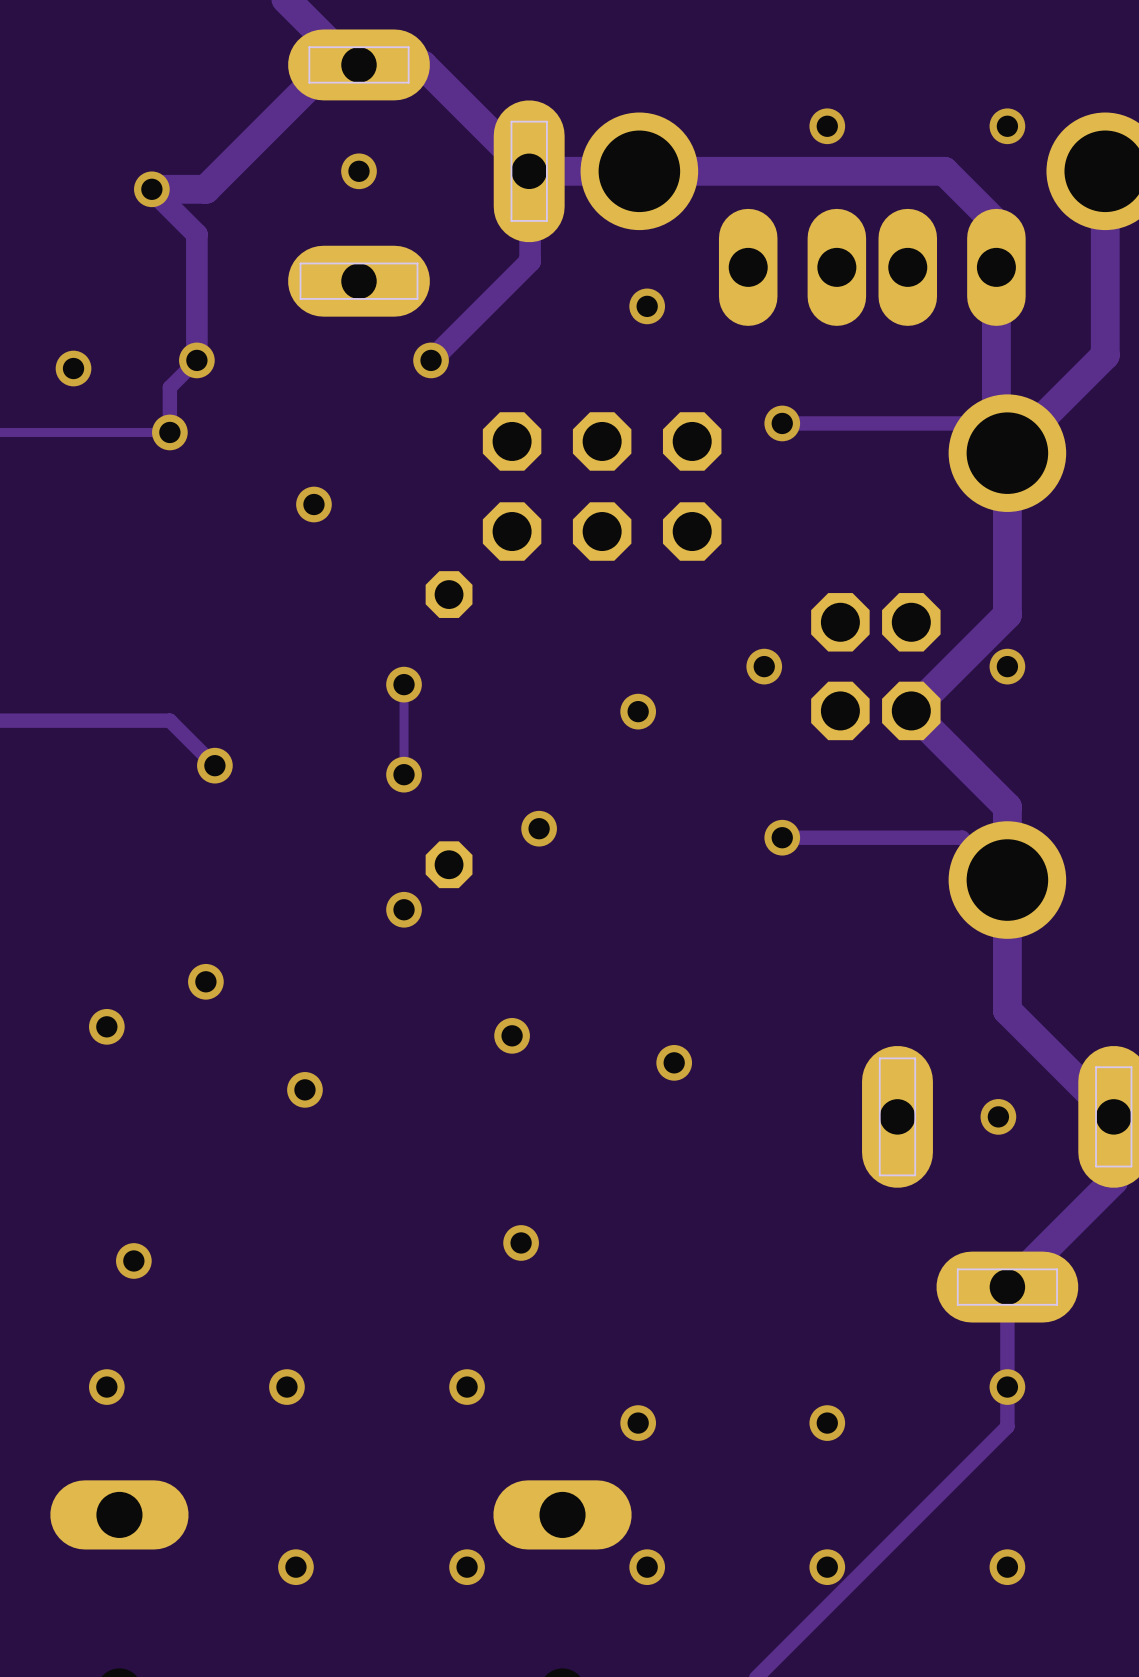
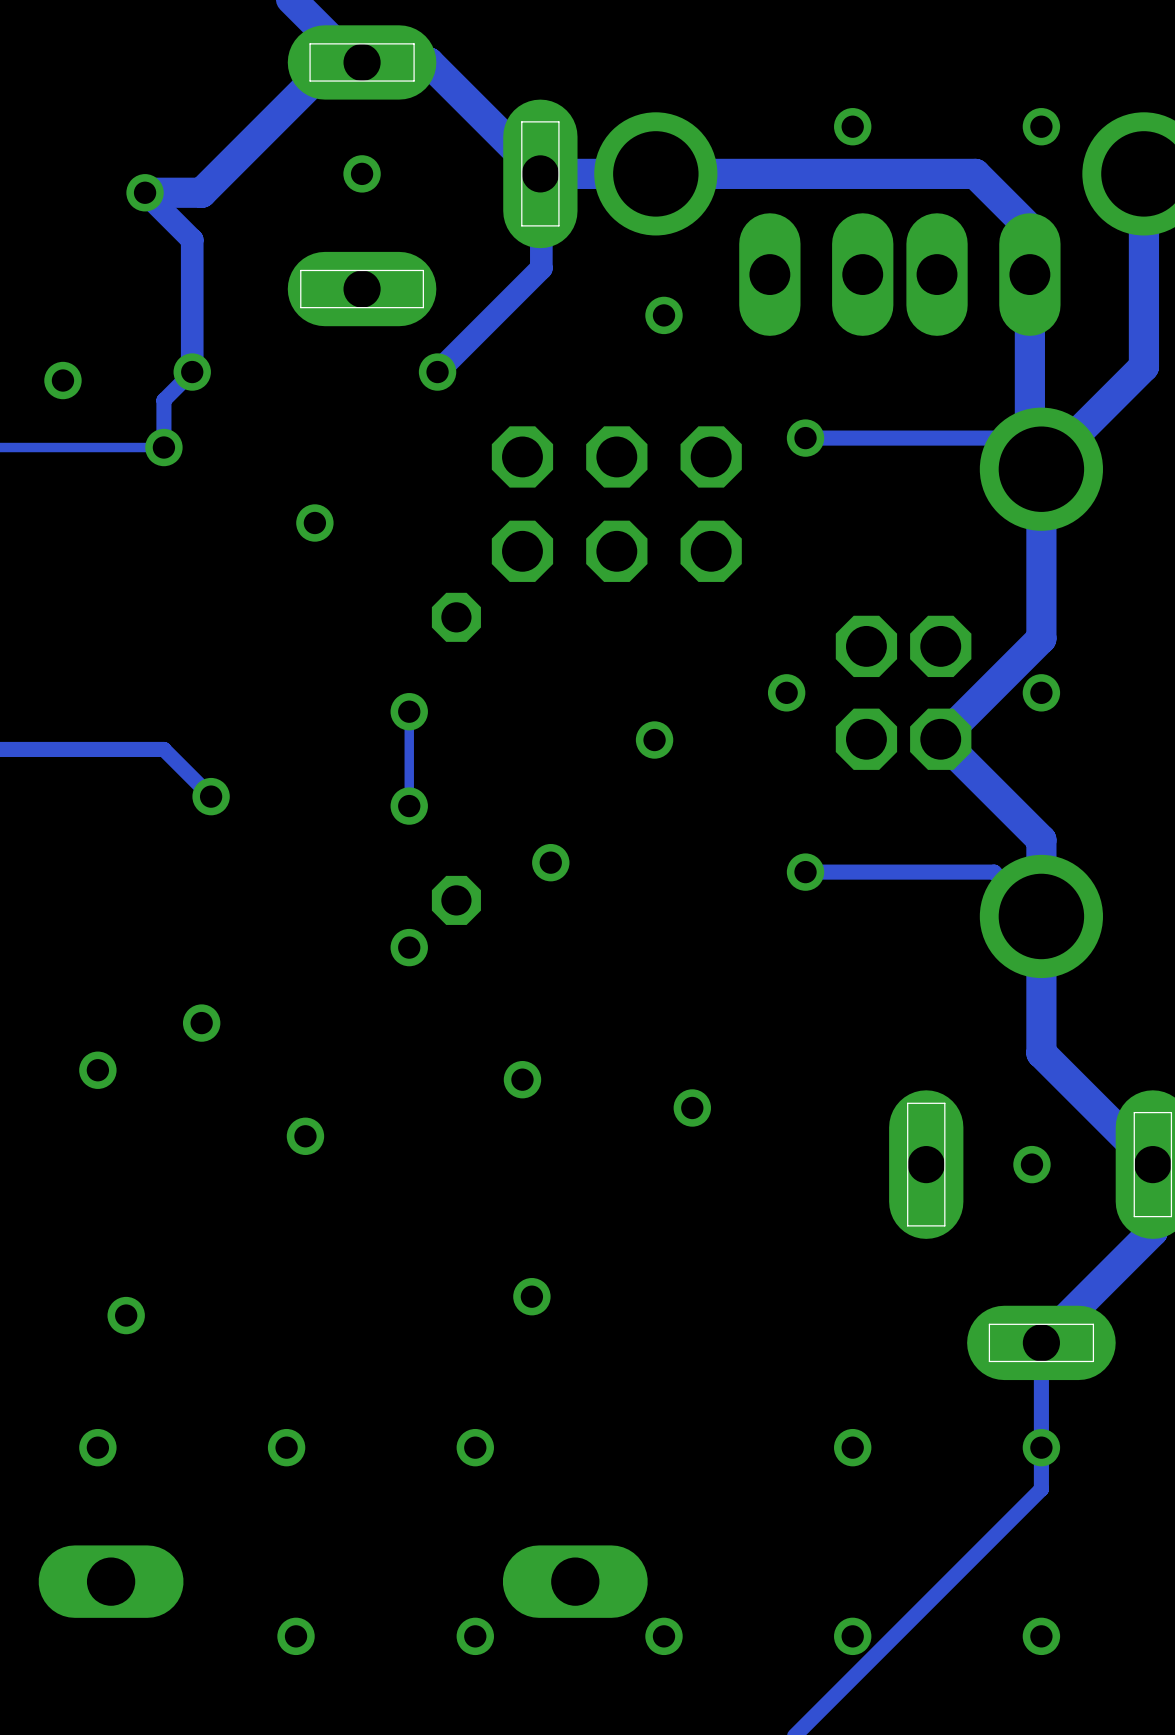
via: (638, 1423) -> none
via position: (827, 1423) -> (852, 1447)

